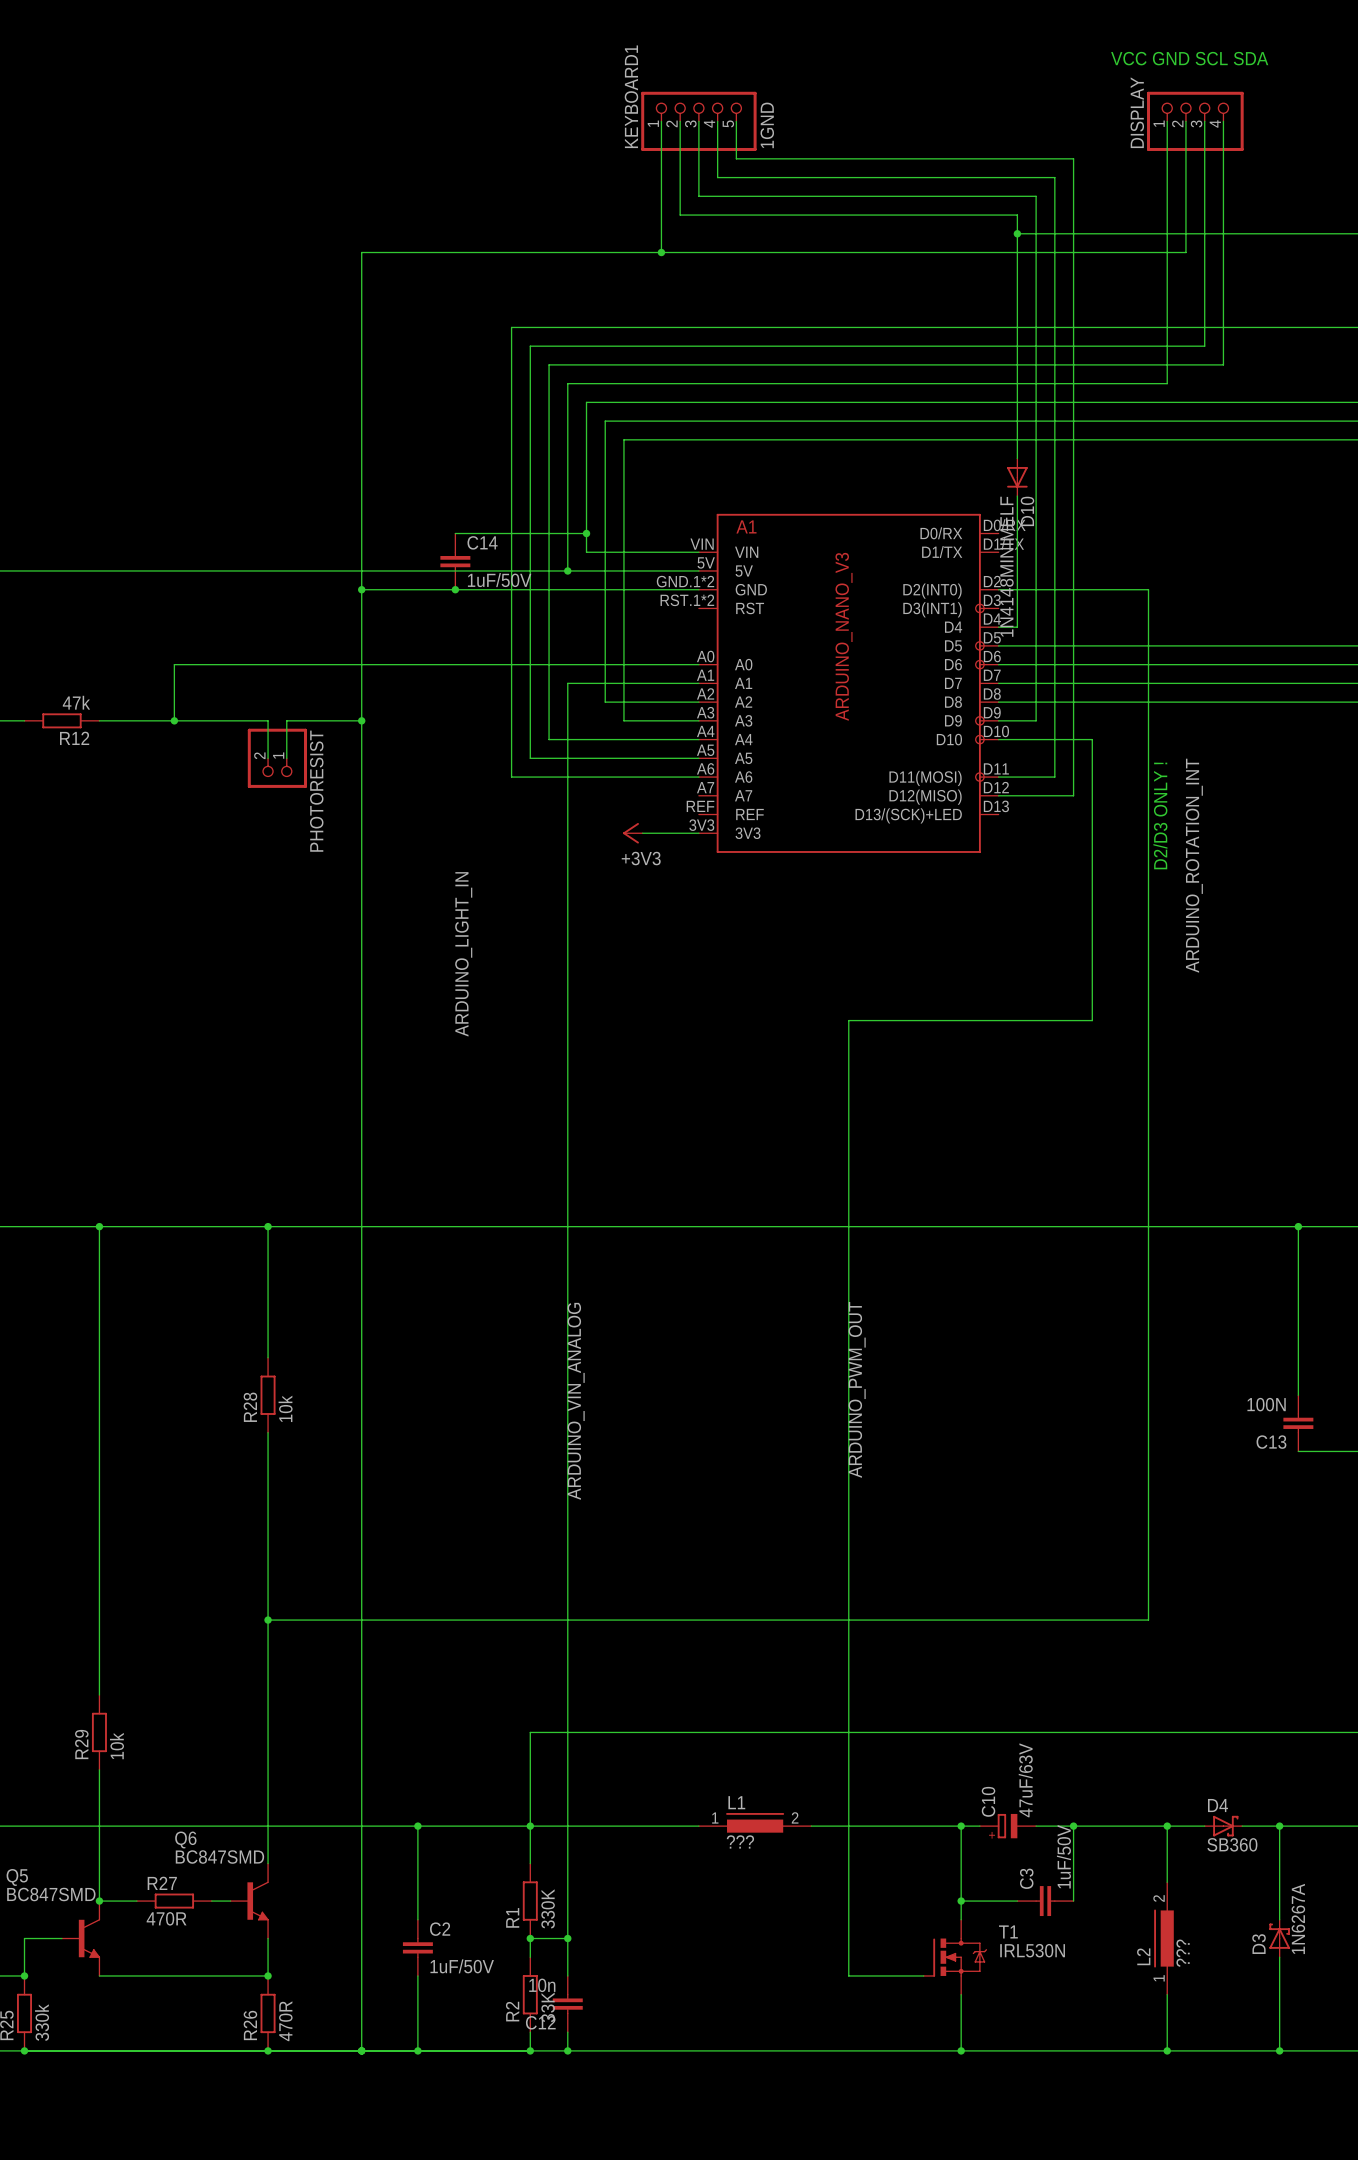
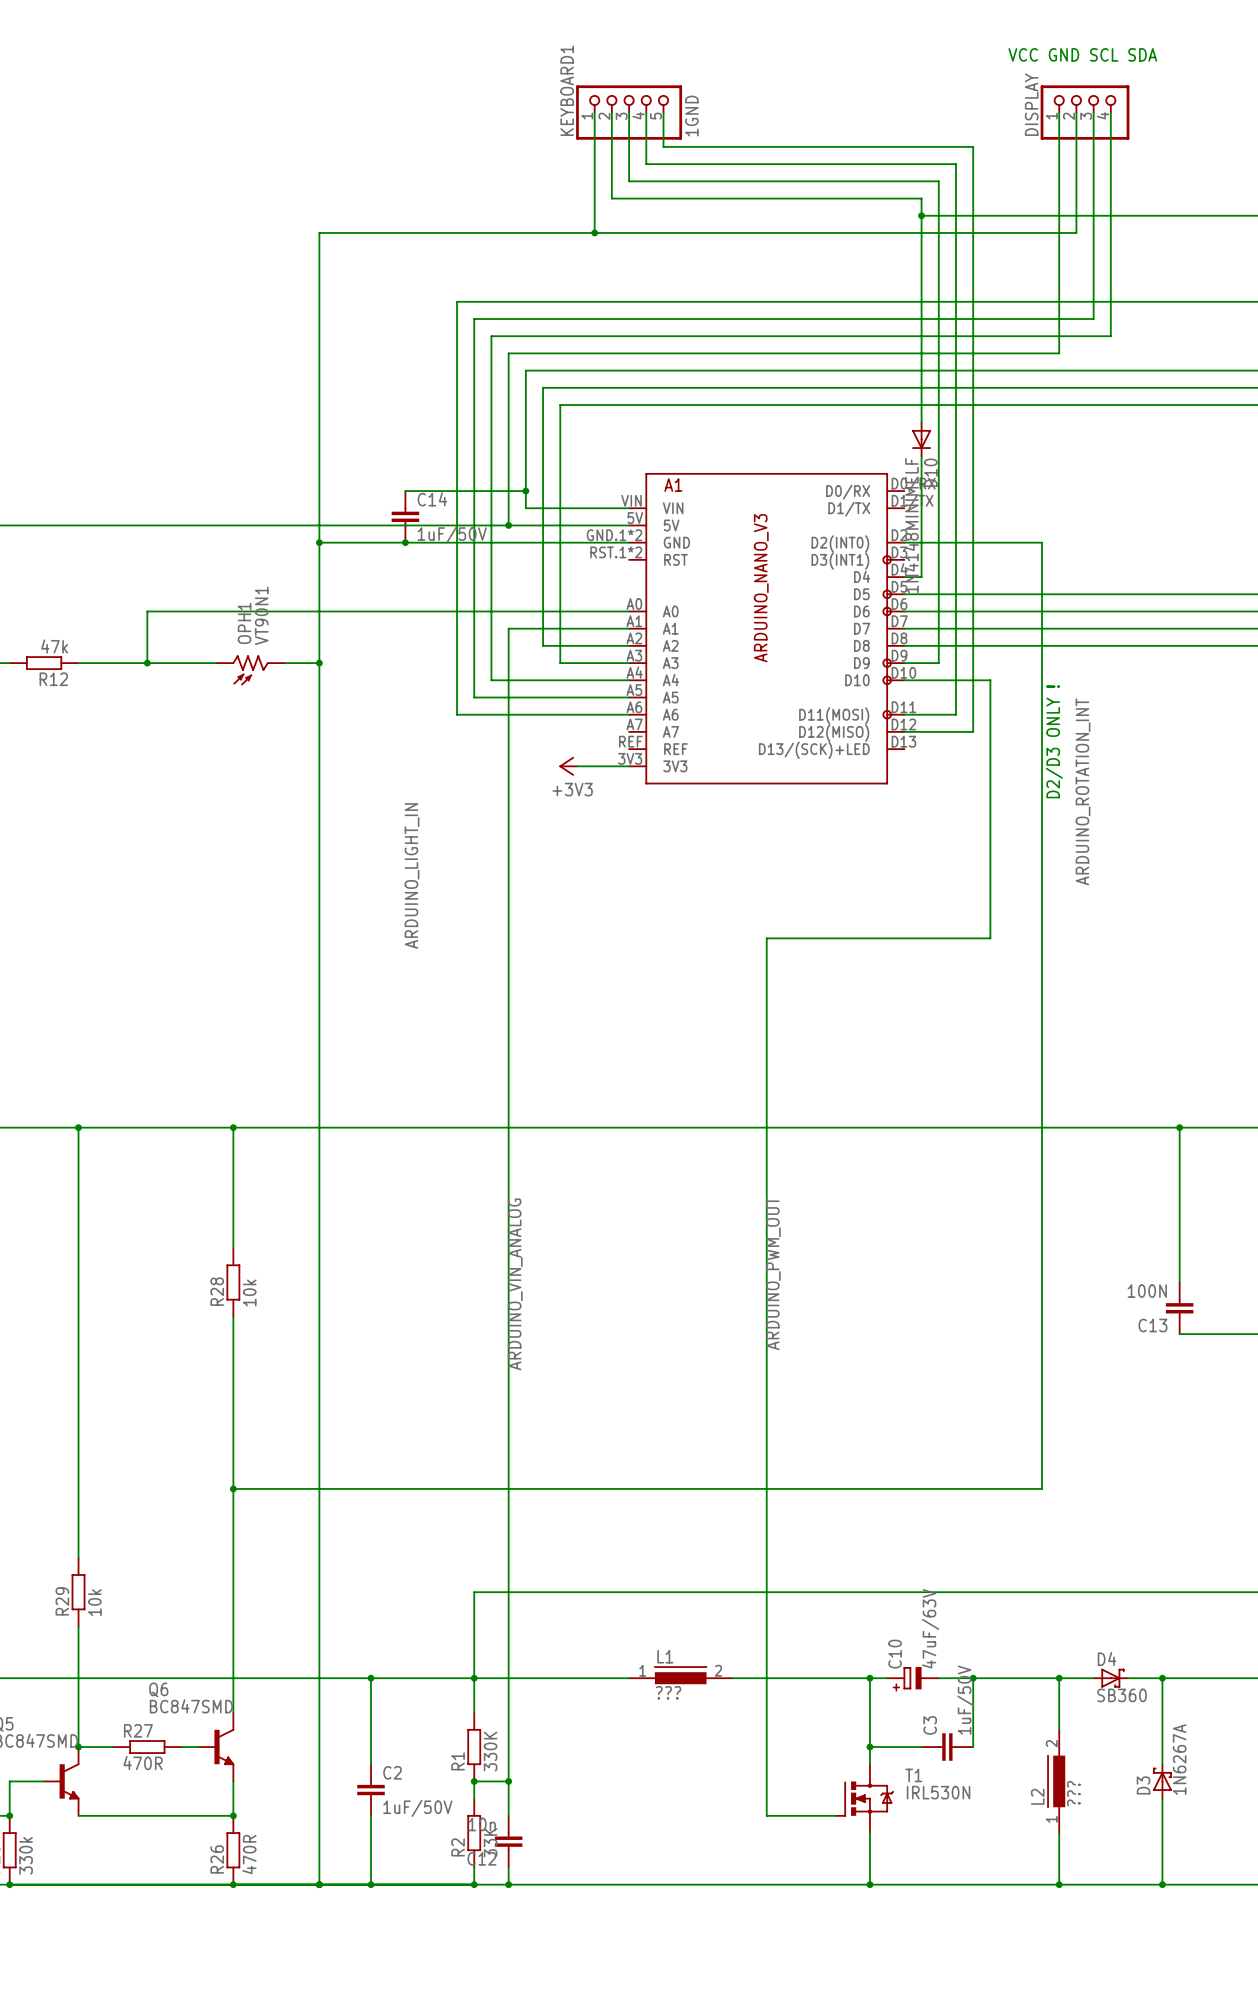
wire: (249, 720) (268, 720) (268, 758) -> none
wire: (324, 720) (286, 720) (286, 758) -> none
OPH1: none -> VT90N1 (250, 670)
PHOTORESIST: (277, 758) -> none

